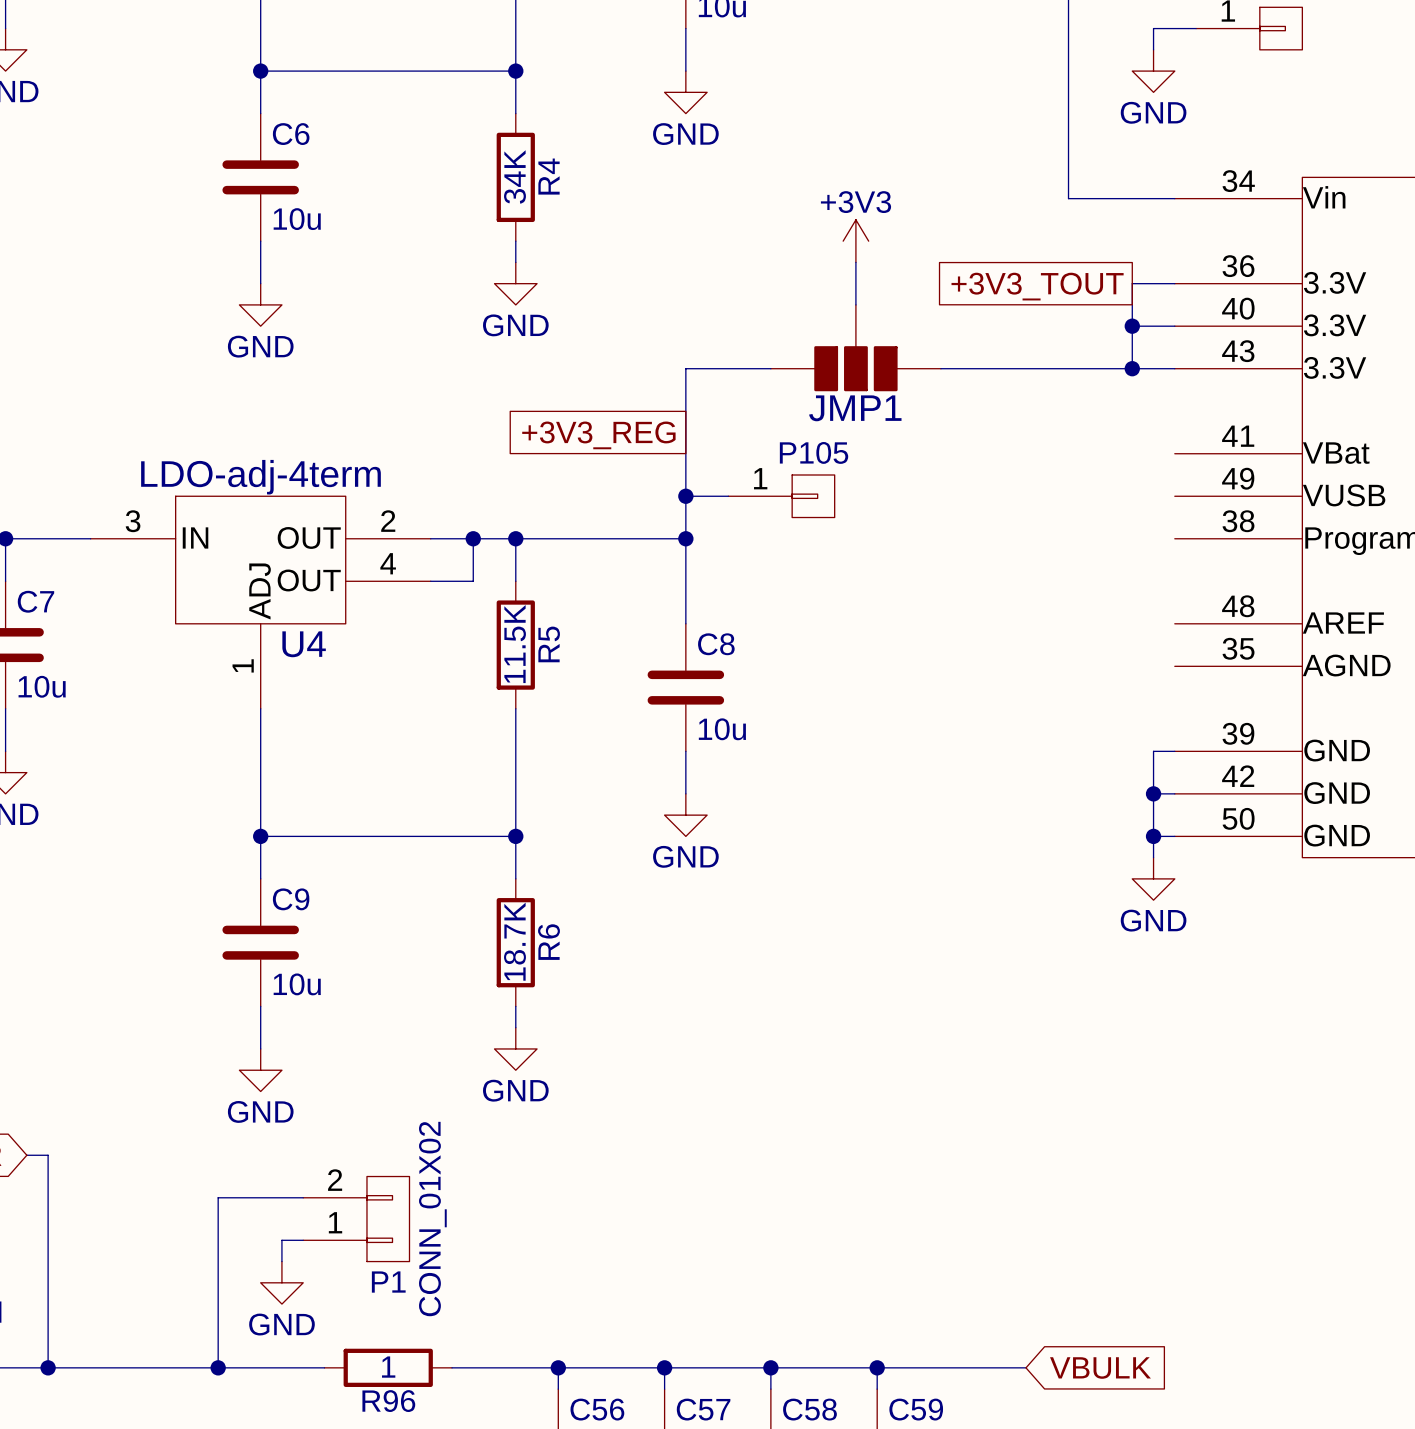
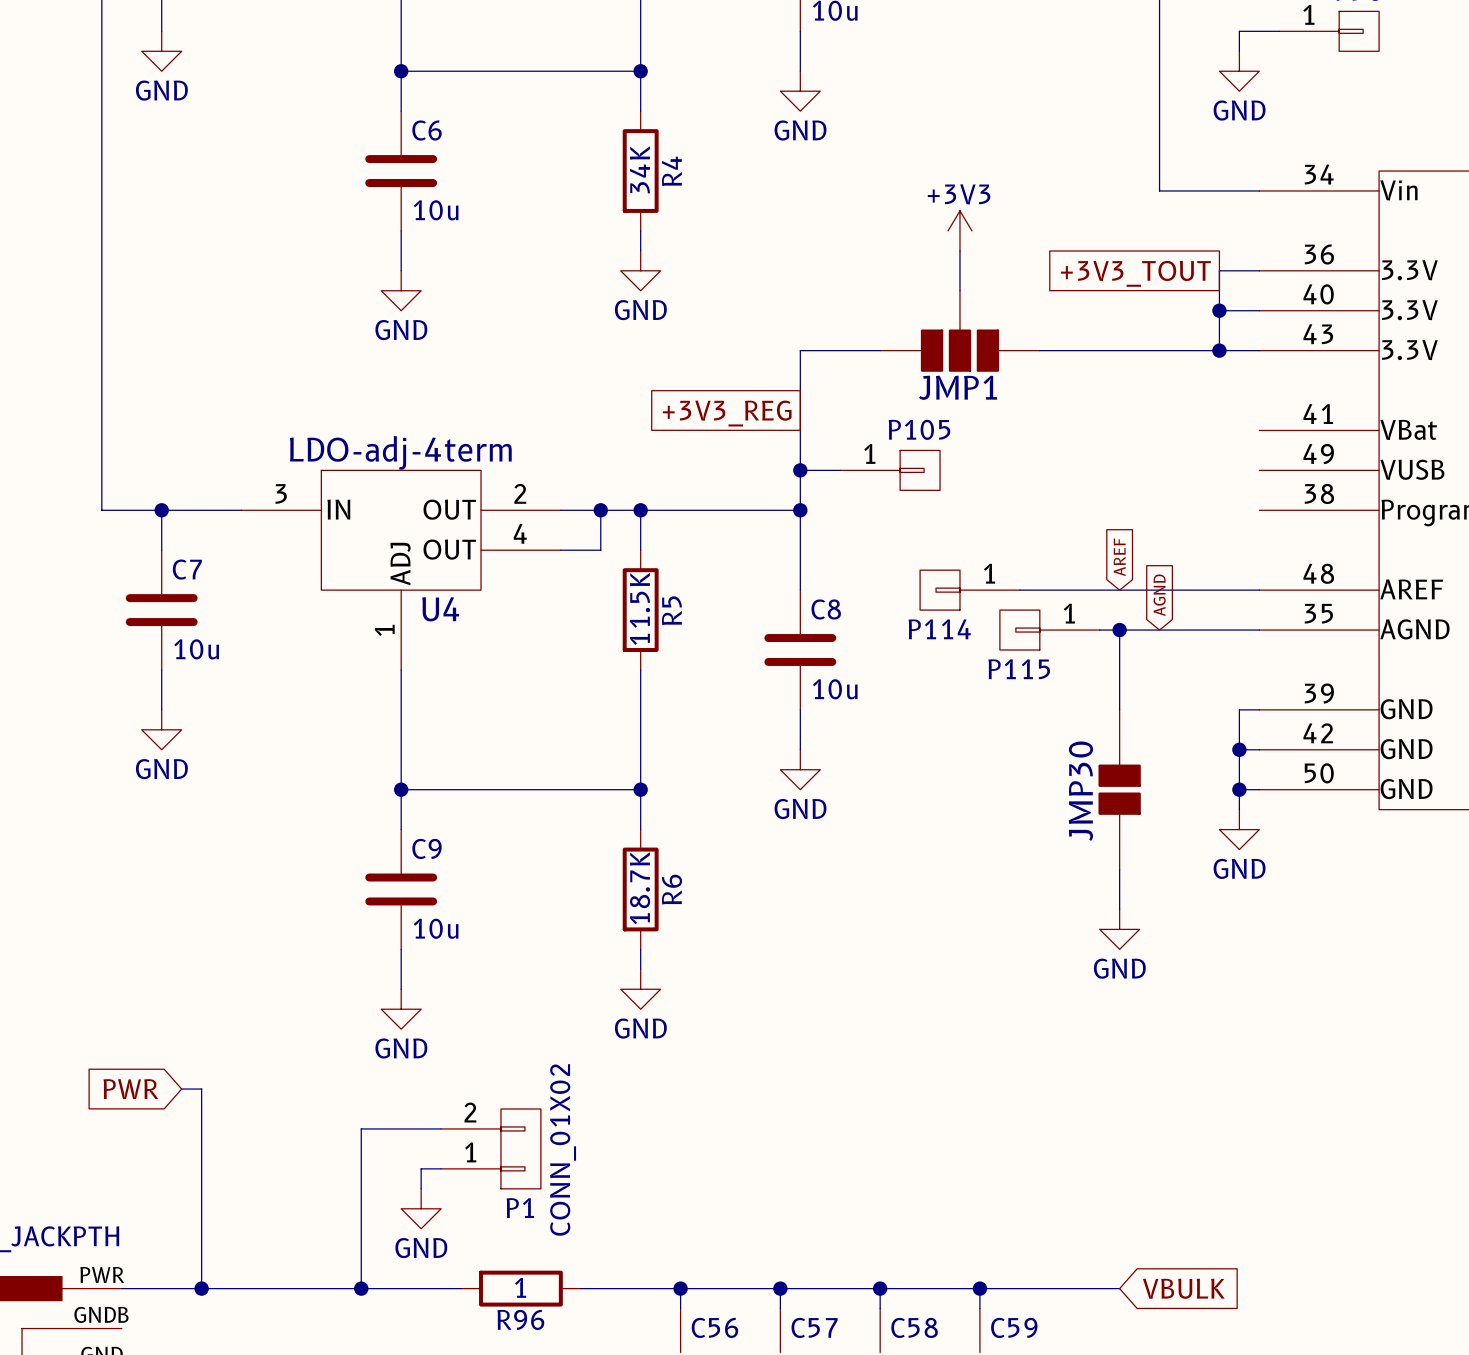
global label: none -> AREF (1119, 557)
P114: none -> (969, 590)
wire: none -> (1019, 590) (1259, 590)
global label: none -> AGND (1159, 595)
P115: none -> (1049, 630)
wire: none -> (1099, 630) (1259, 630)
wire: none -> (1119, 630) (1119, 709)
junction: none -> (1119, 630)
JMP30: none -> (1119, 789)
wire: none -> (1119, 869) (1119, 909)
power symbol: none -> GND (1119, 929)

